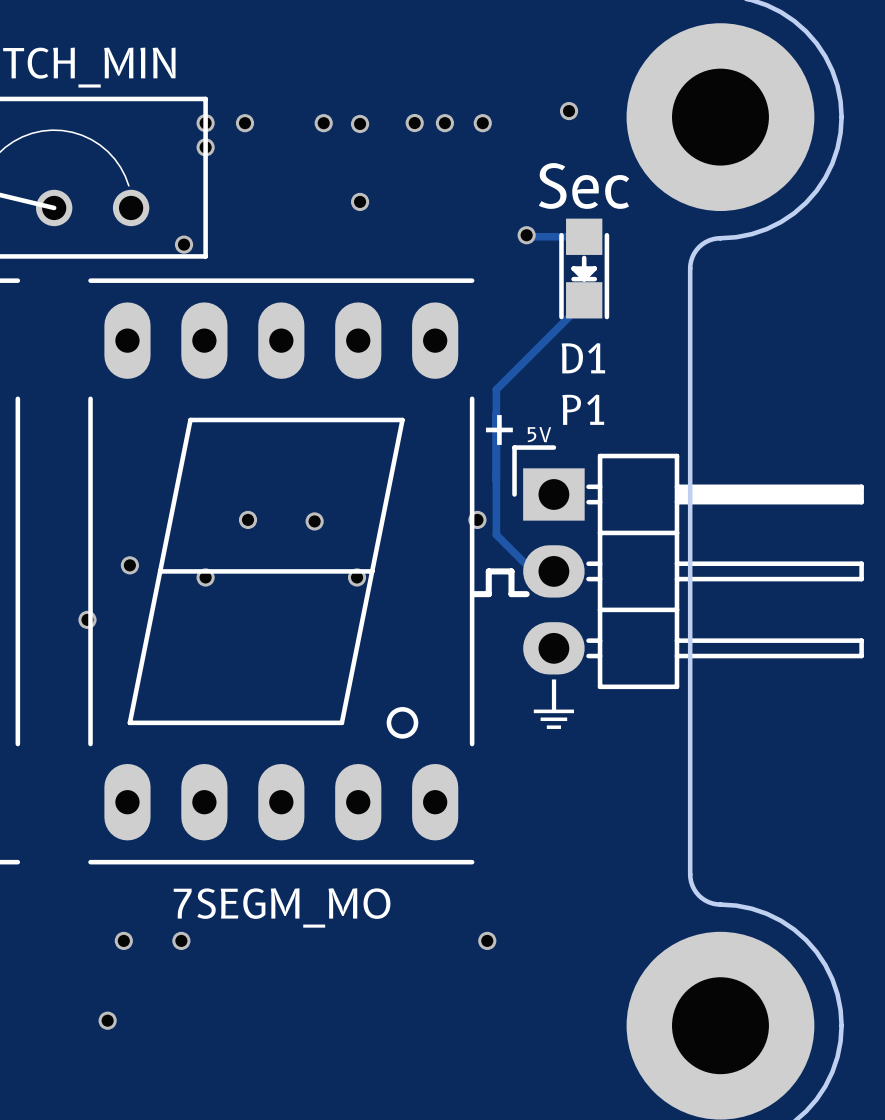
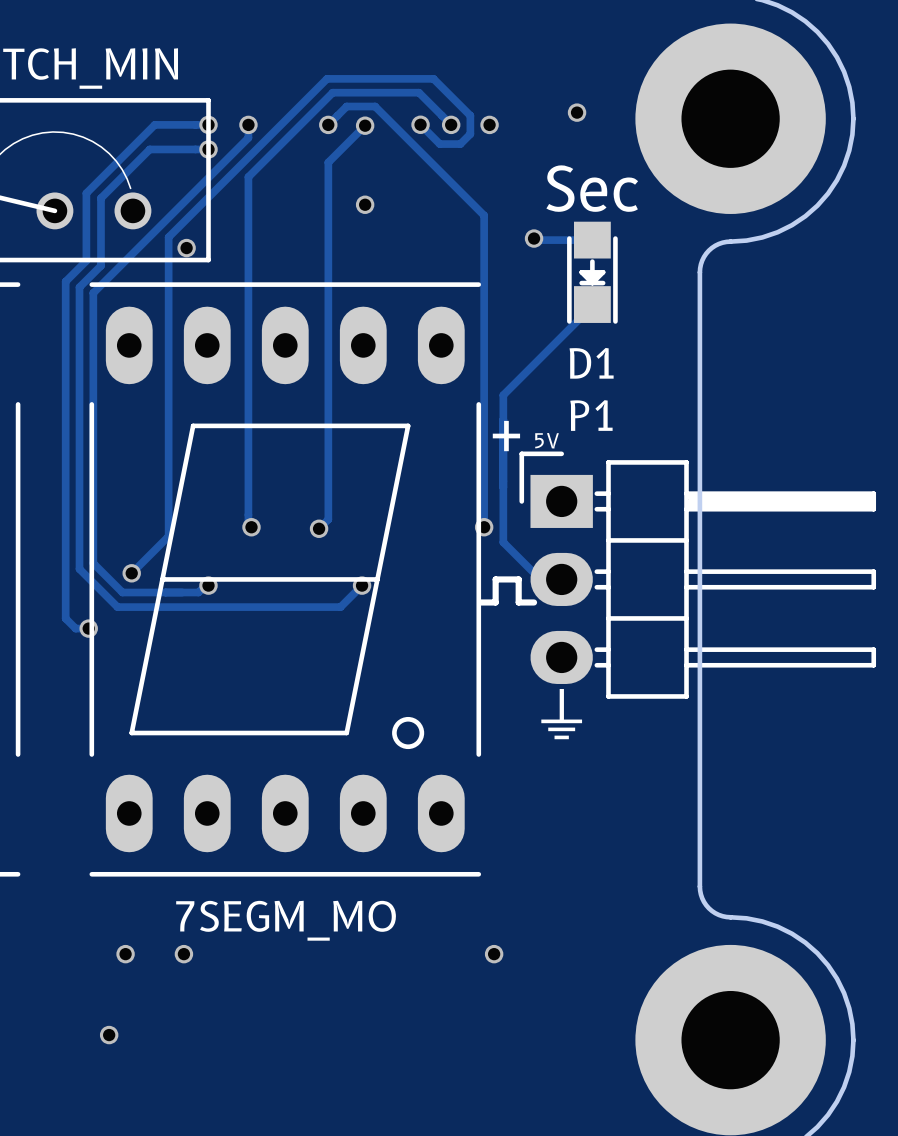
track: none -> (208, 124) (154, 124) (86, 193) (86, 260) (65, 281) (65, 618) (75, 628) (88, 628)
track: none -> (248, 124) (248, 137) (93, 293) (93, 563) (122, 592) (198, 592) (205, 585) (208, 585)
track: none -> (328, 124) (346, 106) (375, 106) (484, 215) (484, 527)
track: none -> (365, 125) (328, 162) (328, 519) (319, 528)
track: none -> (420, 124) (439, 144) (460, 144) (470, 134) (470, 115) (433, 78) (327, 78) (168, 237) (168, 536) (131, 573)
track: none -> (451, 124) (418, 92) (332, 92) (248, 177) (248, 524) (251, 527)
track: none -> (208, 149) (149, 149) (100, 198) (100, 265) (79, 287) (79, 569) (117, 607) (340, 607) (362, 585)

